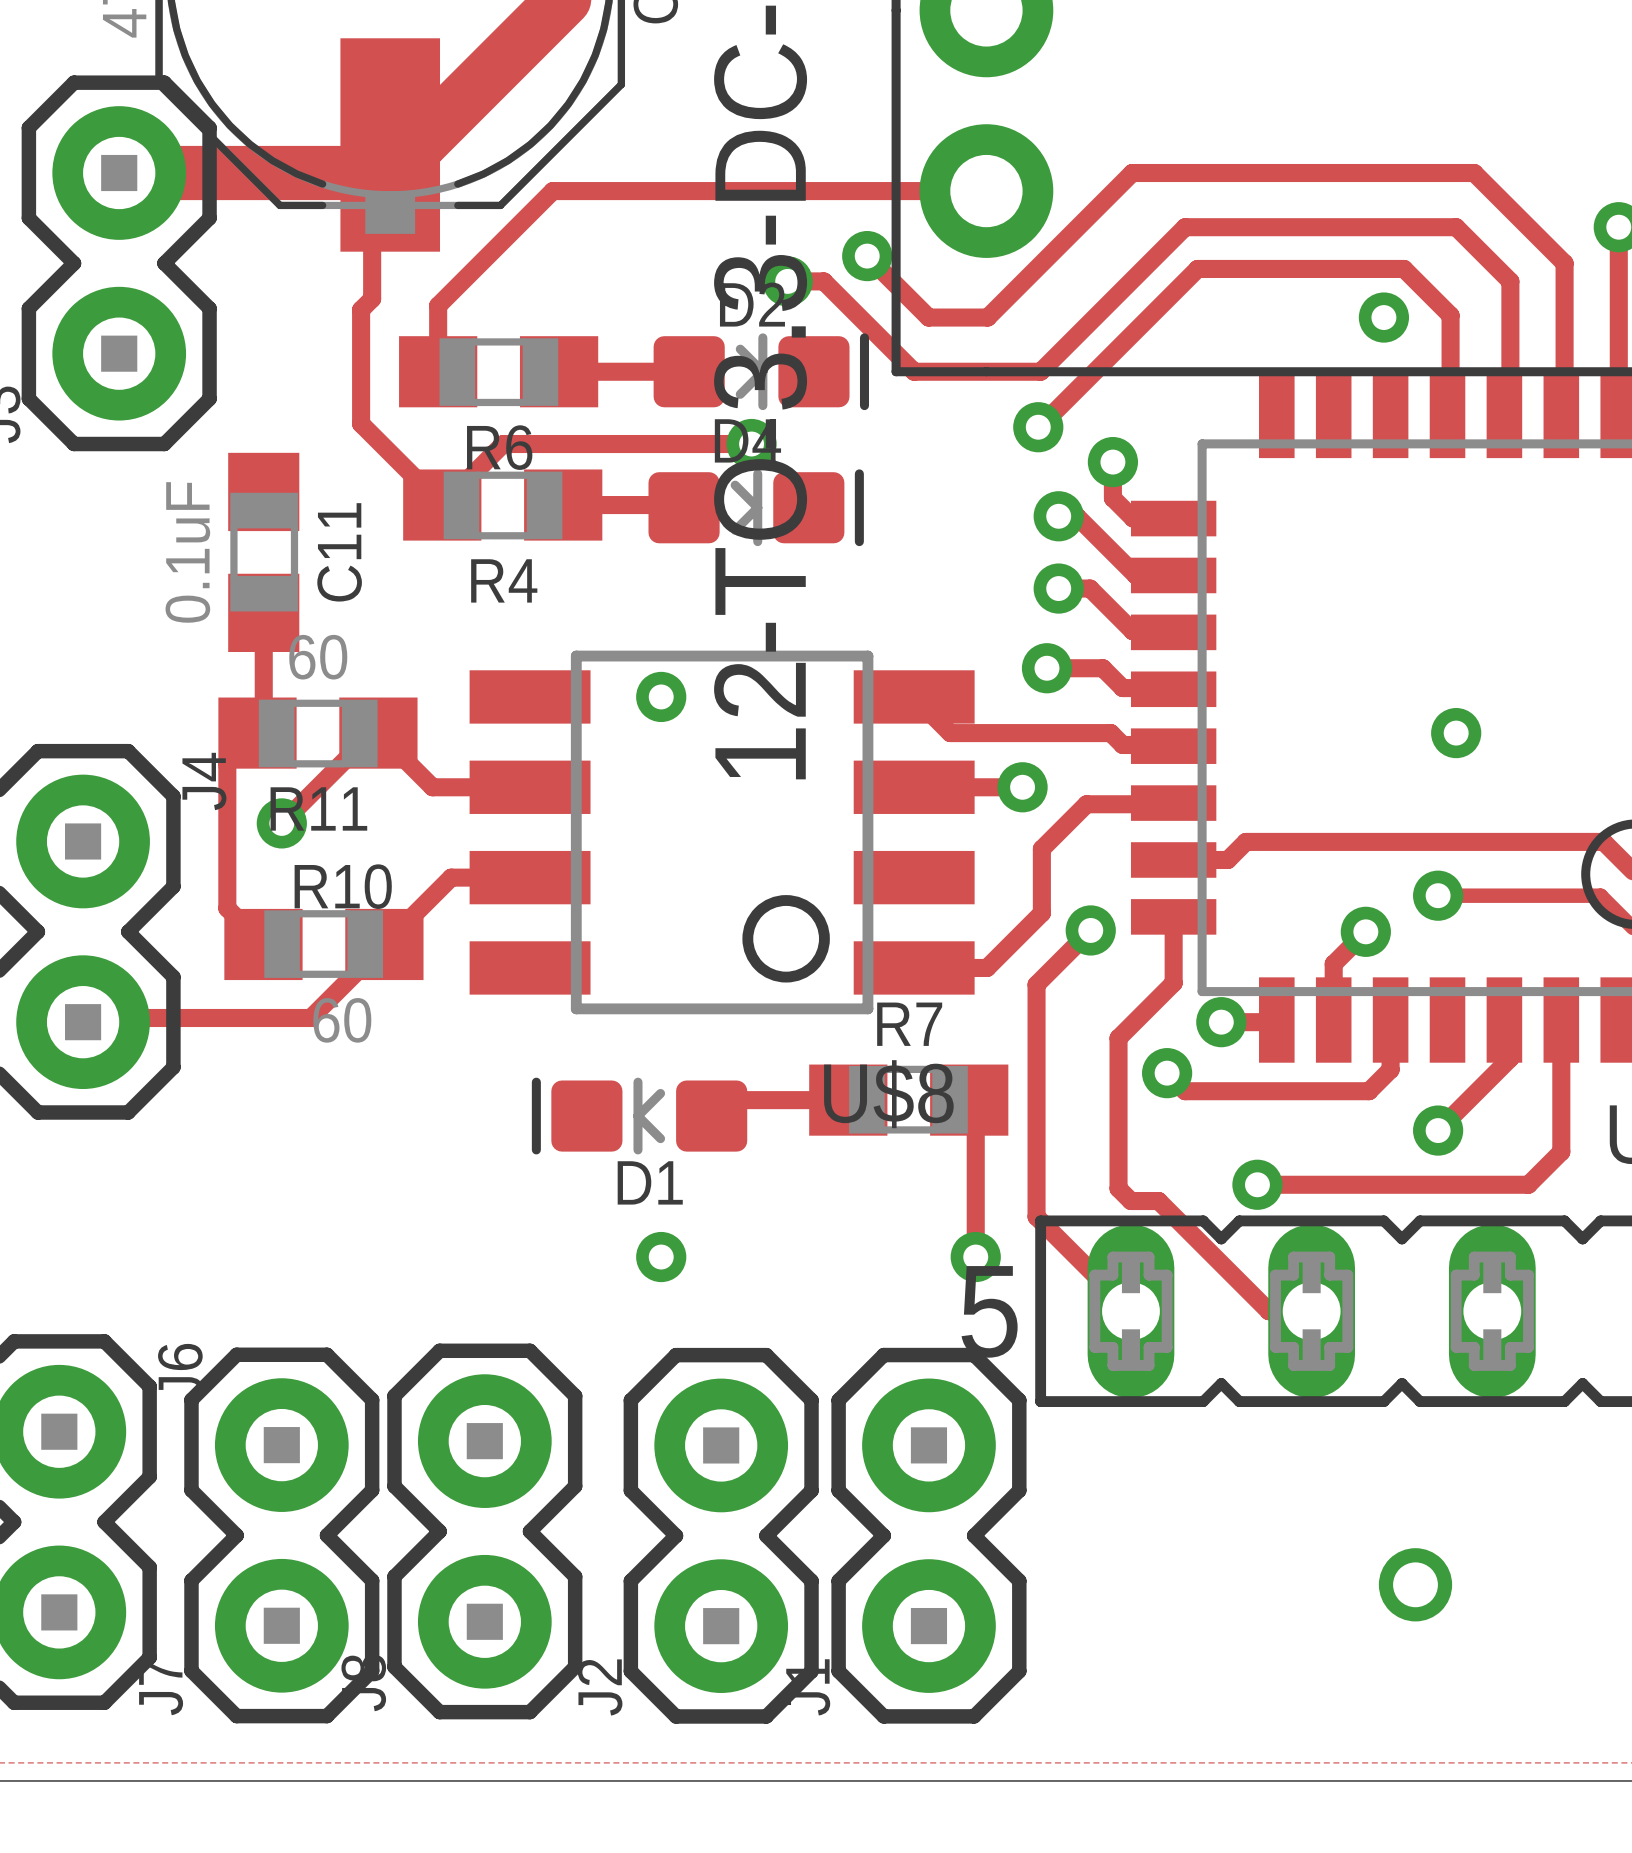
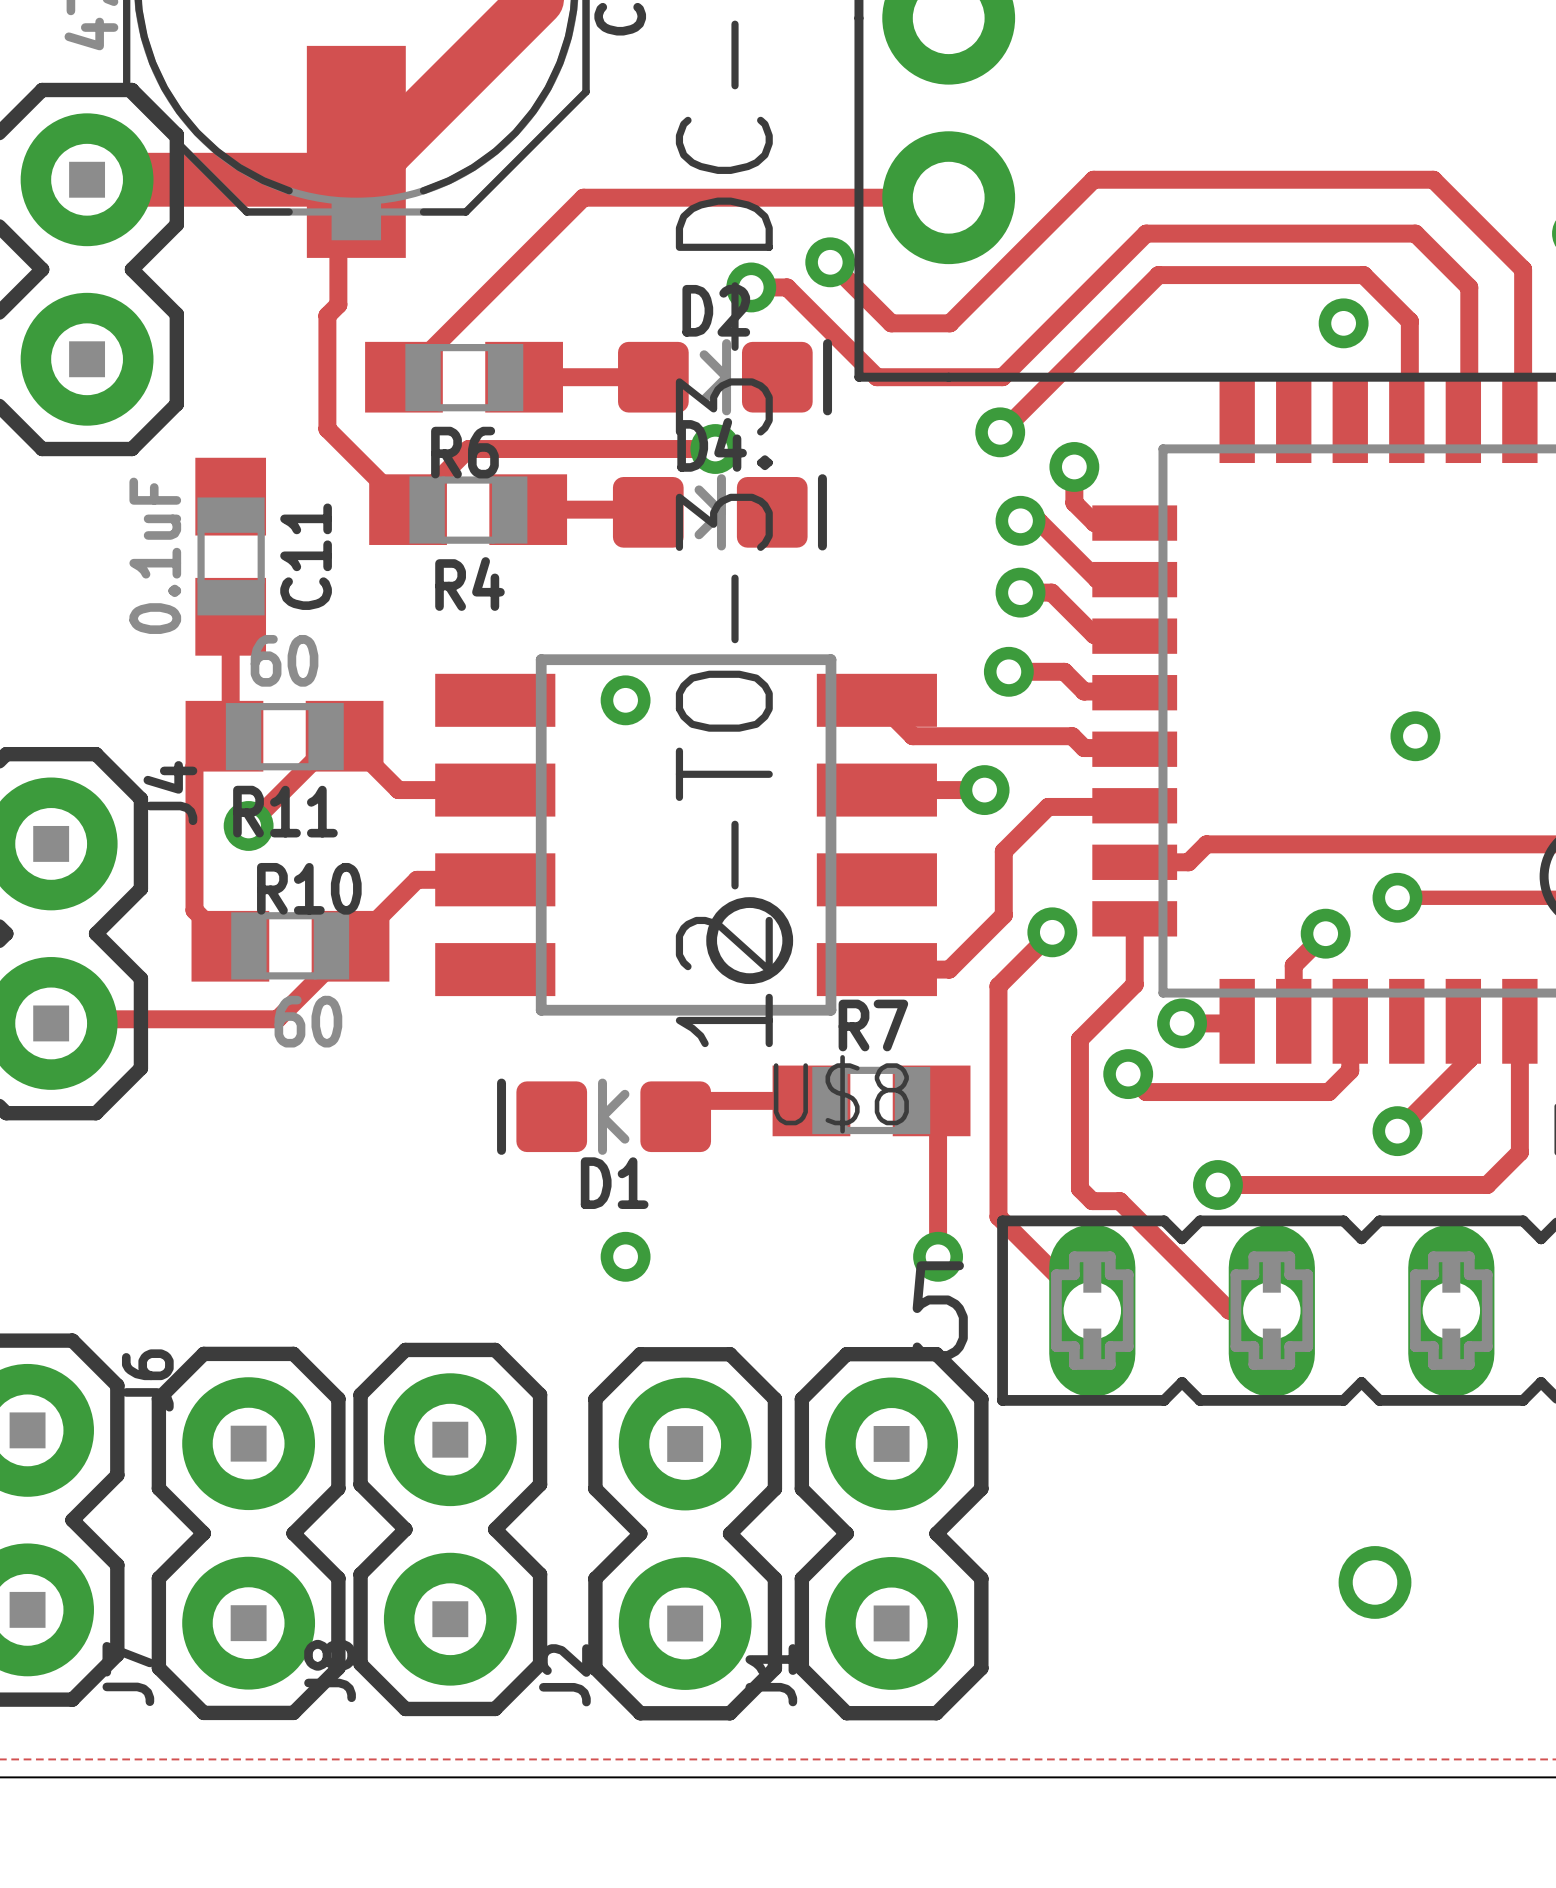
track: (618, 191) (552, 191) (438, 305) (438, 371) -> (583, 197) (403, 377)

